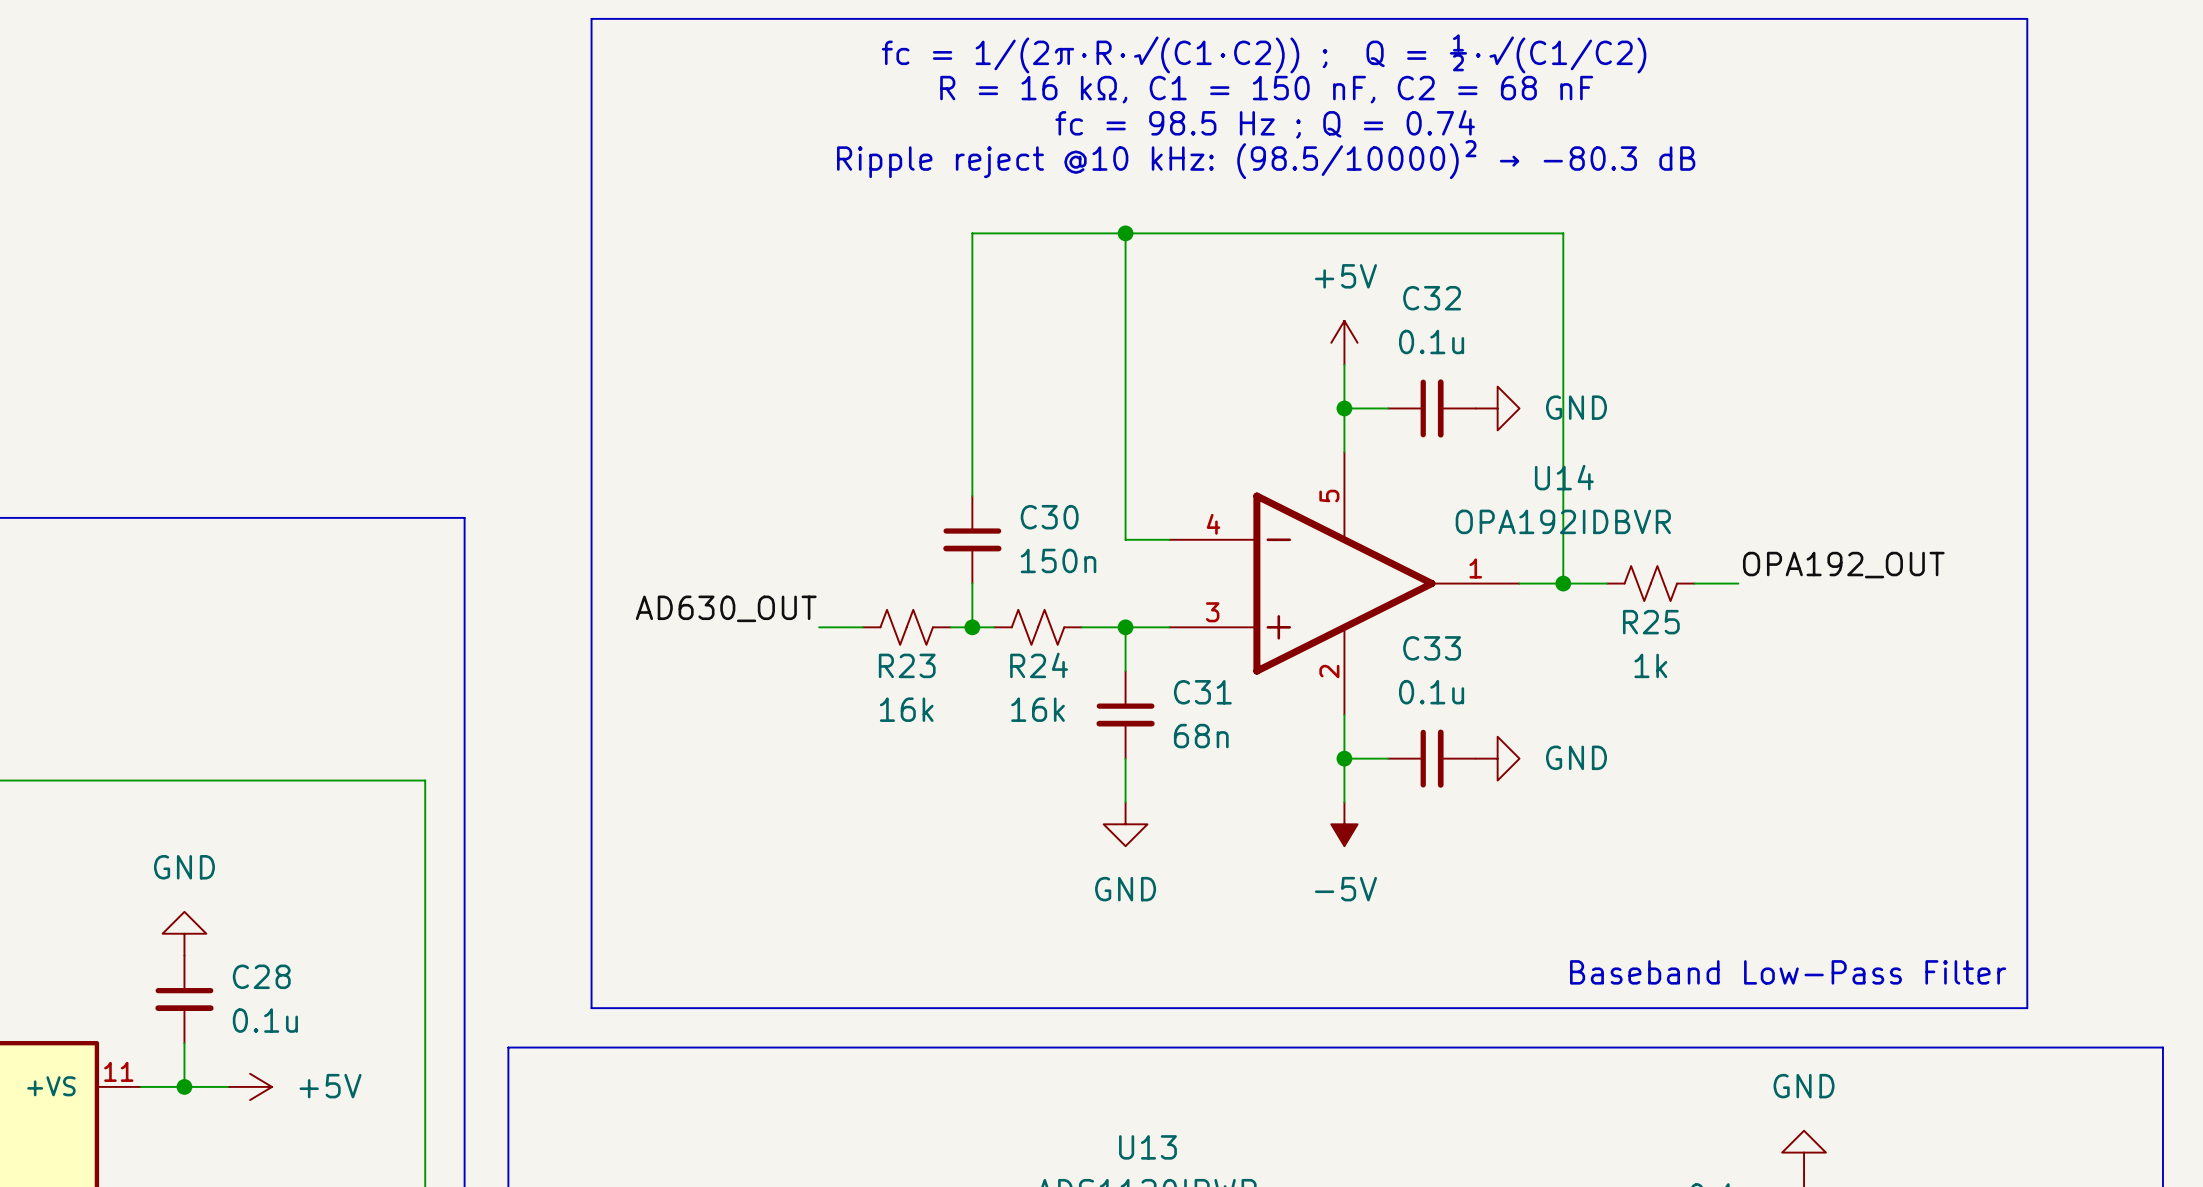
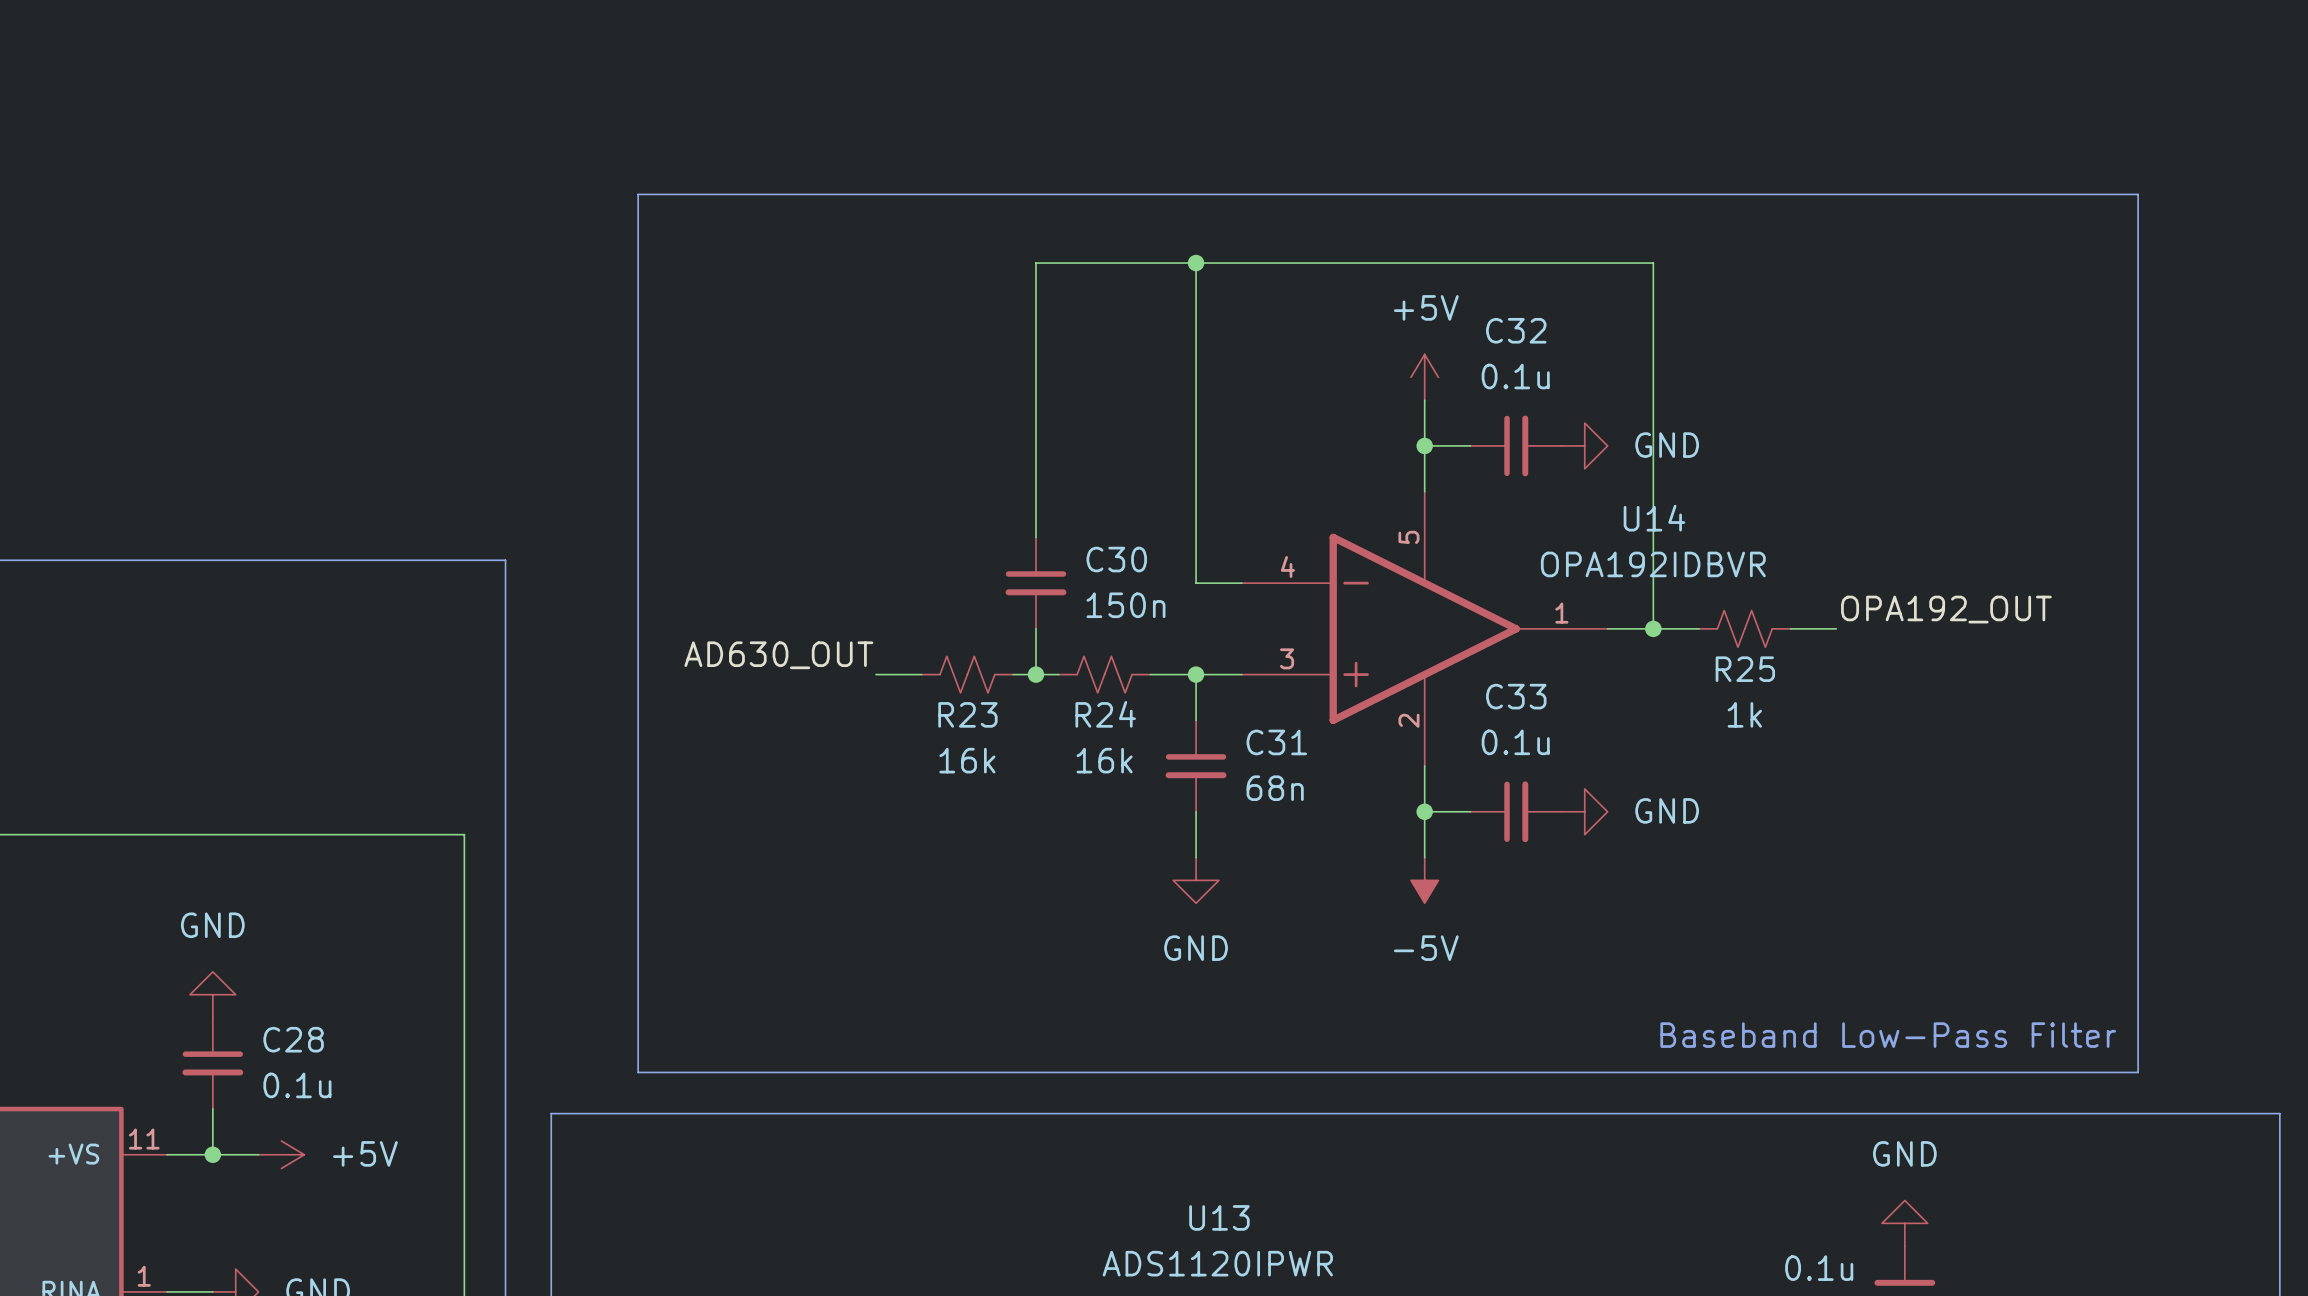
text: fc = 1/(2π·R·√(C1·C2)) ; Q = ½·√(C1/C2) (1264, 53) -> none
text: R = 16 kΩ, C1 = 150 nF, C2 = 68 nF (1266, 89) -> none
text: fc = 98.5 Hz ; Q = 0.74 (1265, 124) -> none
text: Ripple reject @10 kHz: (98.5/10000)² → −80.3 dB (1266, 159) -> none
line: (591, 167) (591, 18) (2027, 18) (2027, 167) -> (638, 194) (2138, 194)

